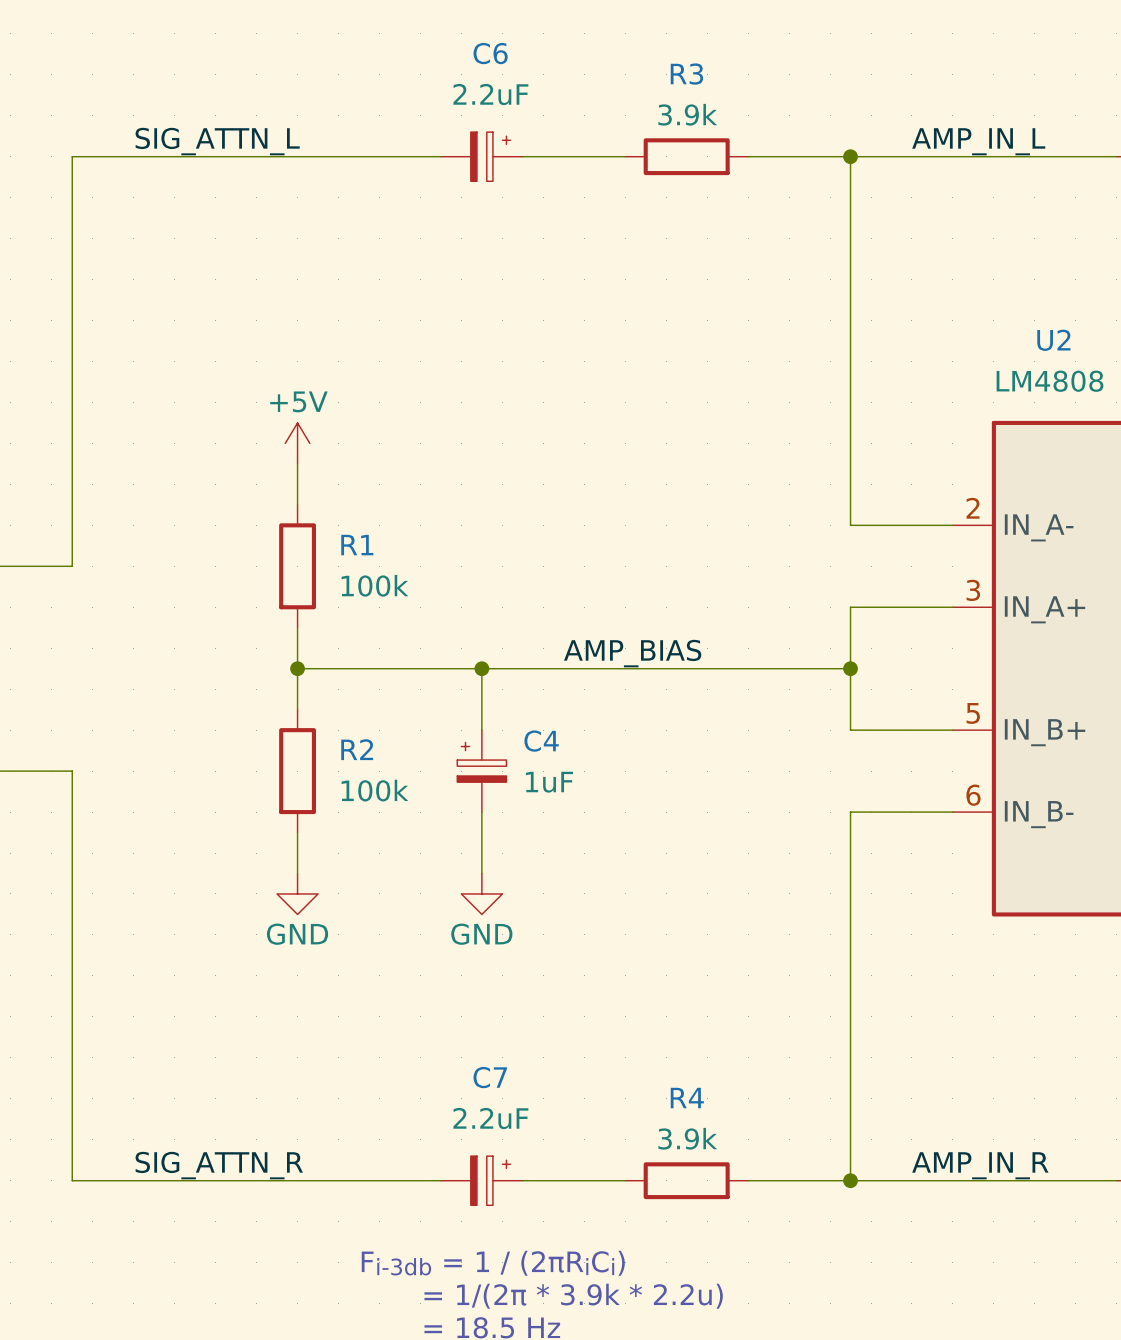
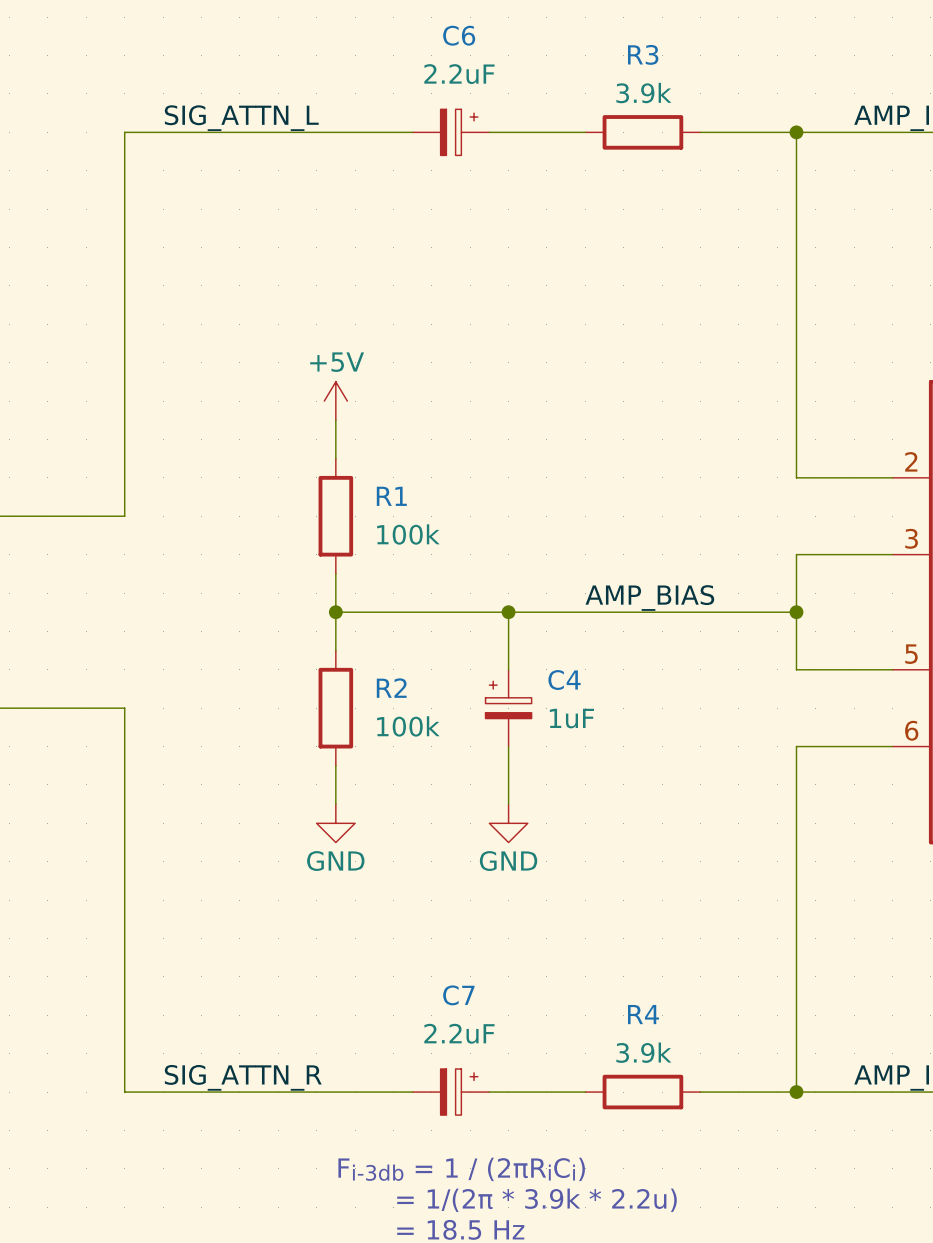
label position: SIG_ATTN_L (217, 141) -> SIG_ATTN_L (241, 118)
wire: (133, 156) (72, 156) (72, 566) -> (124, 132) (124, 516) (67, 516)
power symbol position: +5V (297, 443) -> +5V (335, 401)
wire: (297, 463) (297, 504) -> (335, 420) (335, 458)
R1 position: (297, 566) -> (335, 516)
wire: (297, 627) (297, 709) -> (335, 573) (335, 650)
label position: AMP_BIAS (632, 653) -> AMP_BIAS (649, 598)
wire: (297, 668) (359, 668) -> none
junction: (297, 668) -> none
junction: none -> (335, 612)
wire: (481, 668) (481, 730) -> (508, 612) (508, 669)
junction: (481, 668) -> none
junction: none -> (508, 612)
wire: (72, 771) (72, 1180) (133, 1180) -> (67, 708) (124, 708) (124, 1092)
R2 position: (297, 771) -> (335, 708)
C4 position: (481, 771) -> (508, 708)
wire: (481, 812) (481, 873) -> (508, 746) (508, 804)
wire: (297, 832) (297, 873) -> (335, 765) (335, 804)
power symbol: GND (297, 893) -> none
power symbol: none -> GND (335, 823)
power symbol: GND (481, 893) -> none
power symbol: none -> GND (508, 823)
label position: SIG_ATTN_R (219, 1165) -> SIG_ATTN_R (243, 1077)

